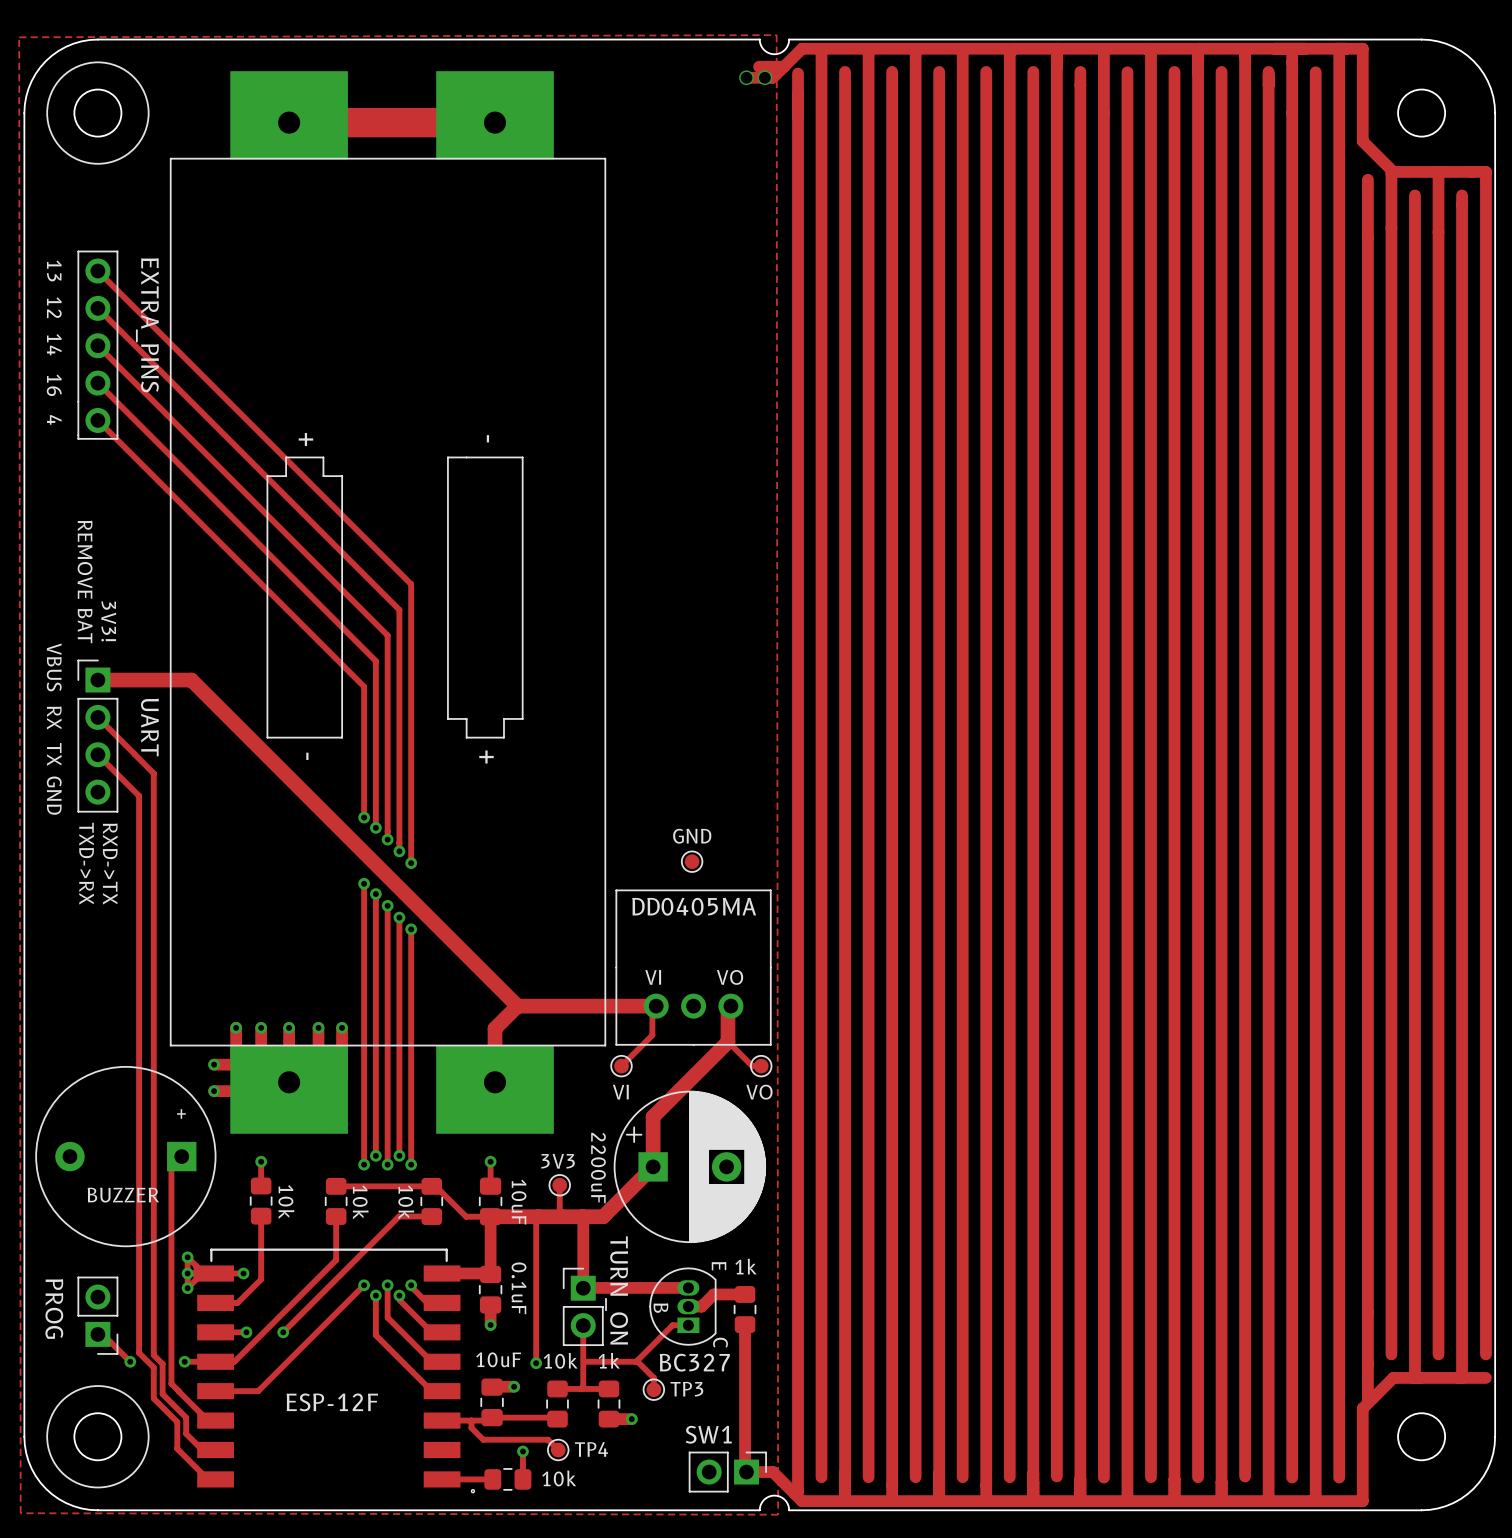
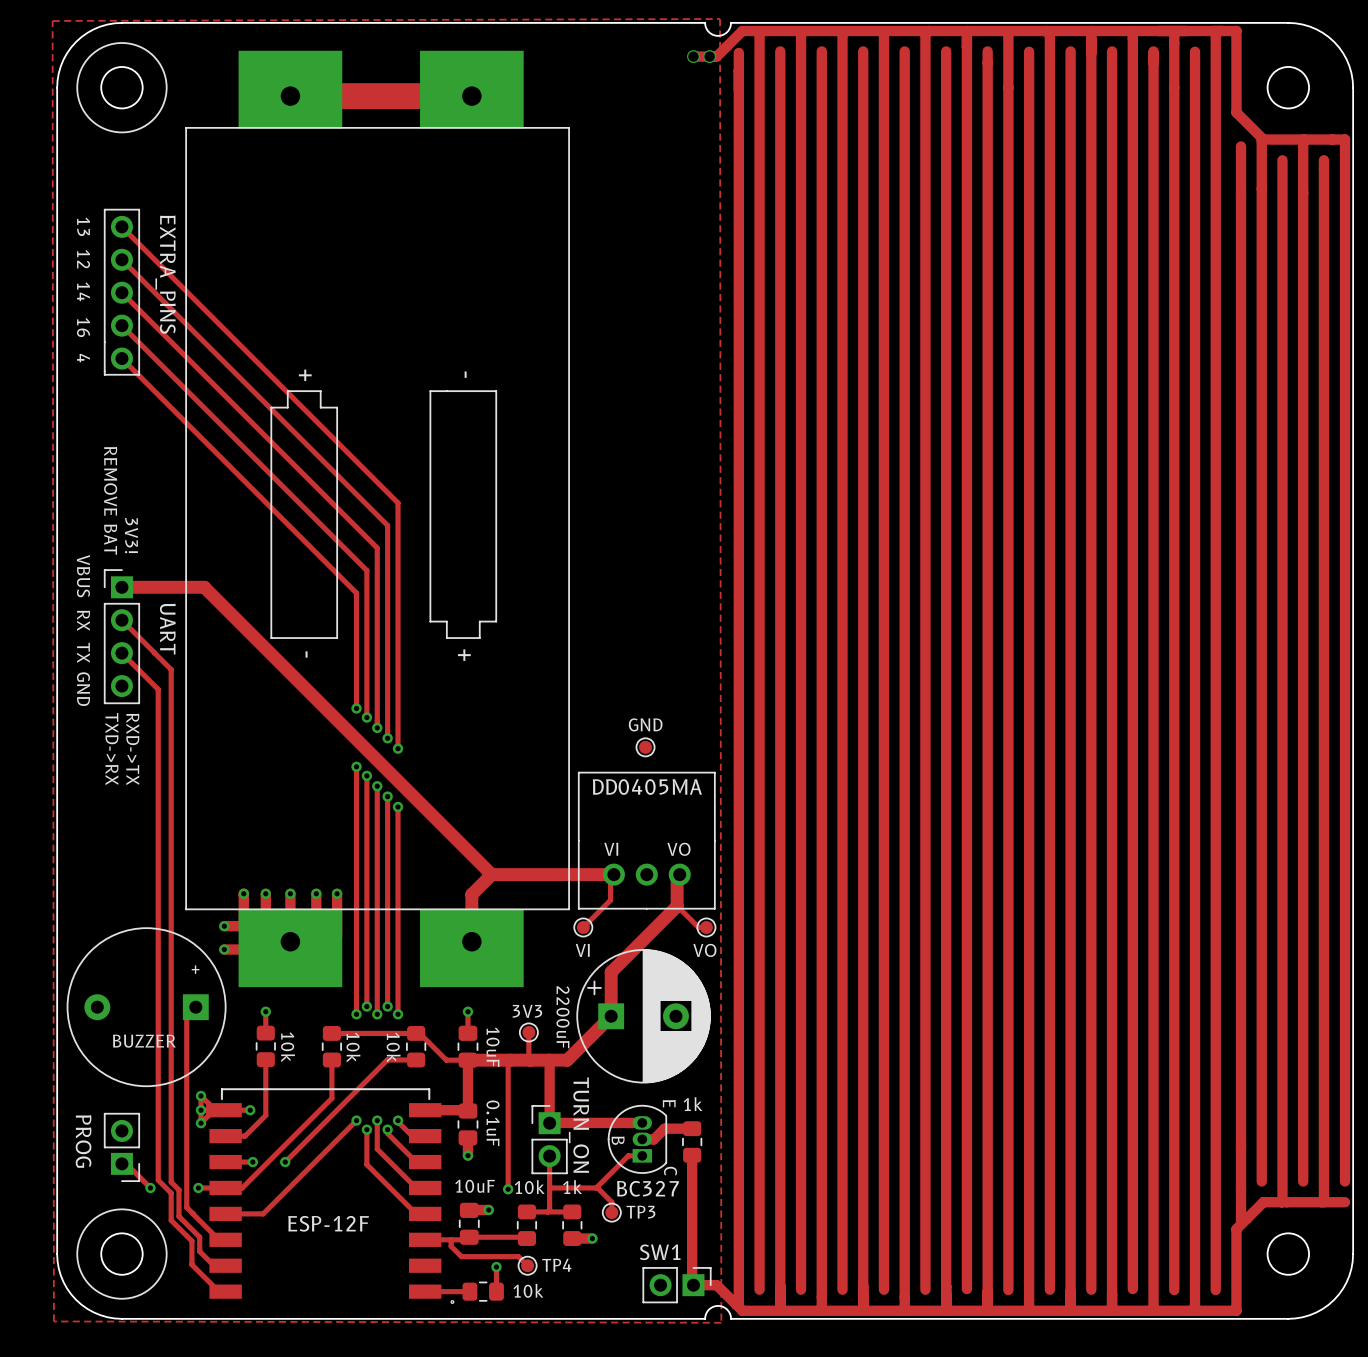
track: (759, 66) (784, 66) -> none

